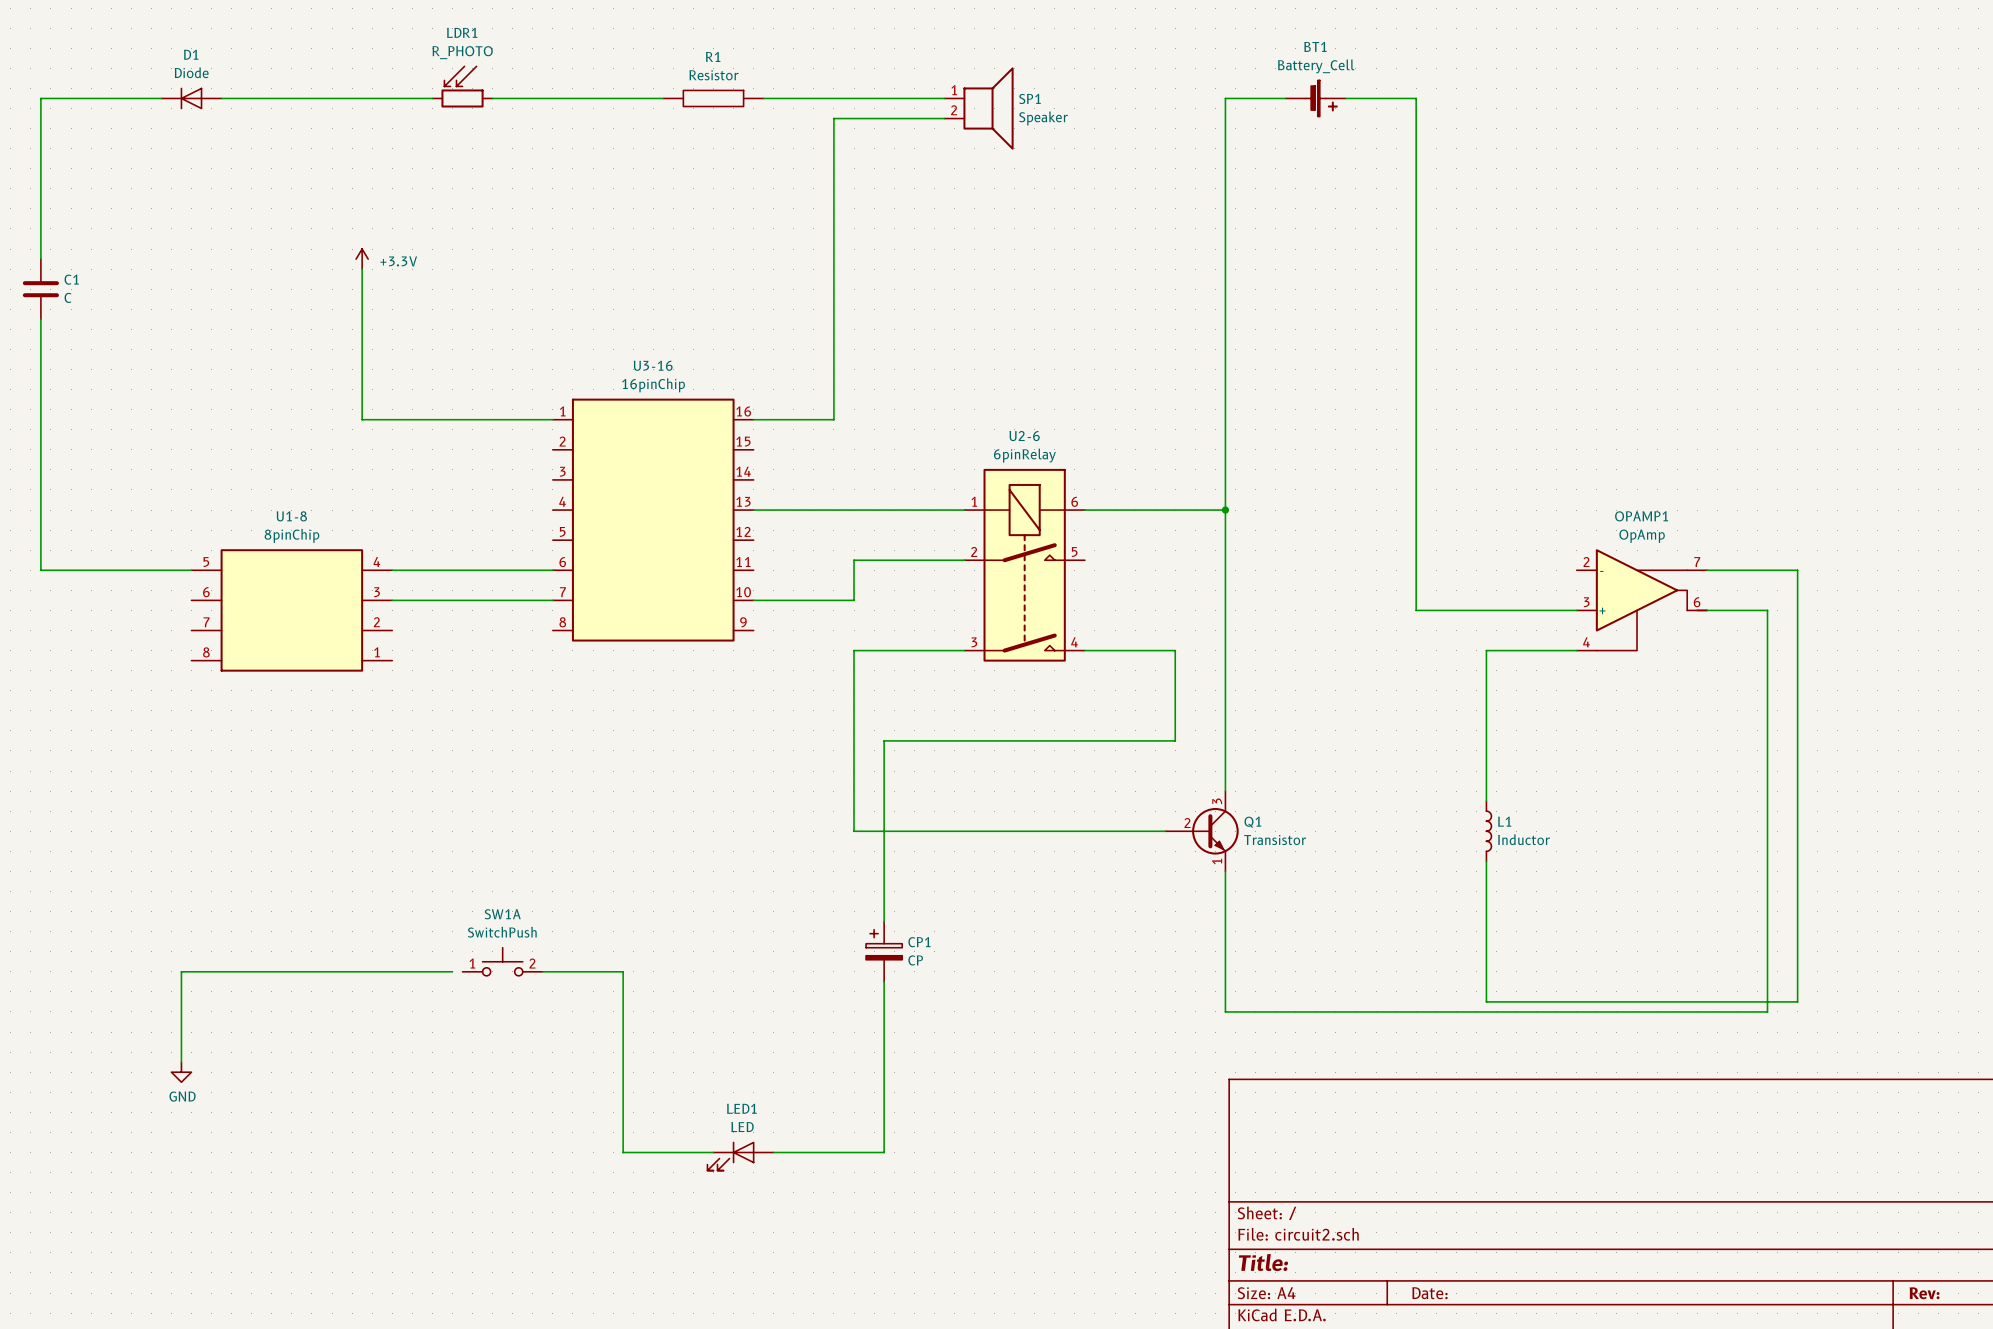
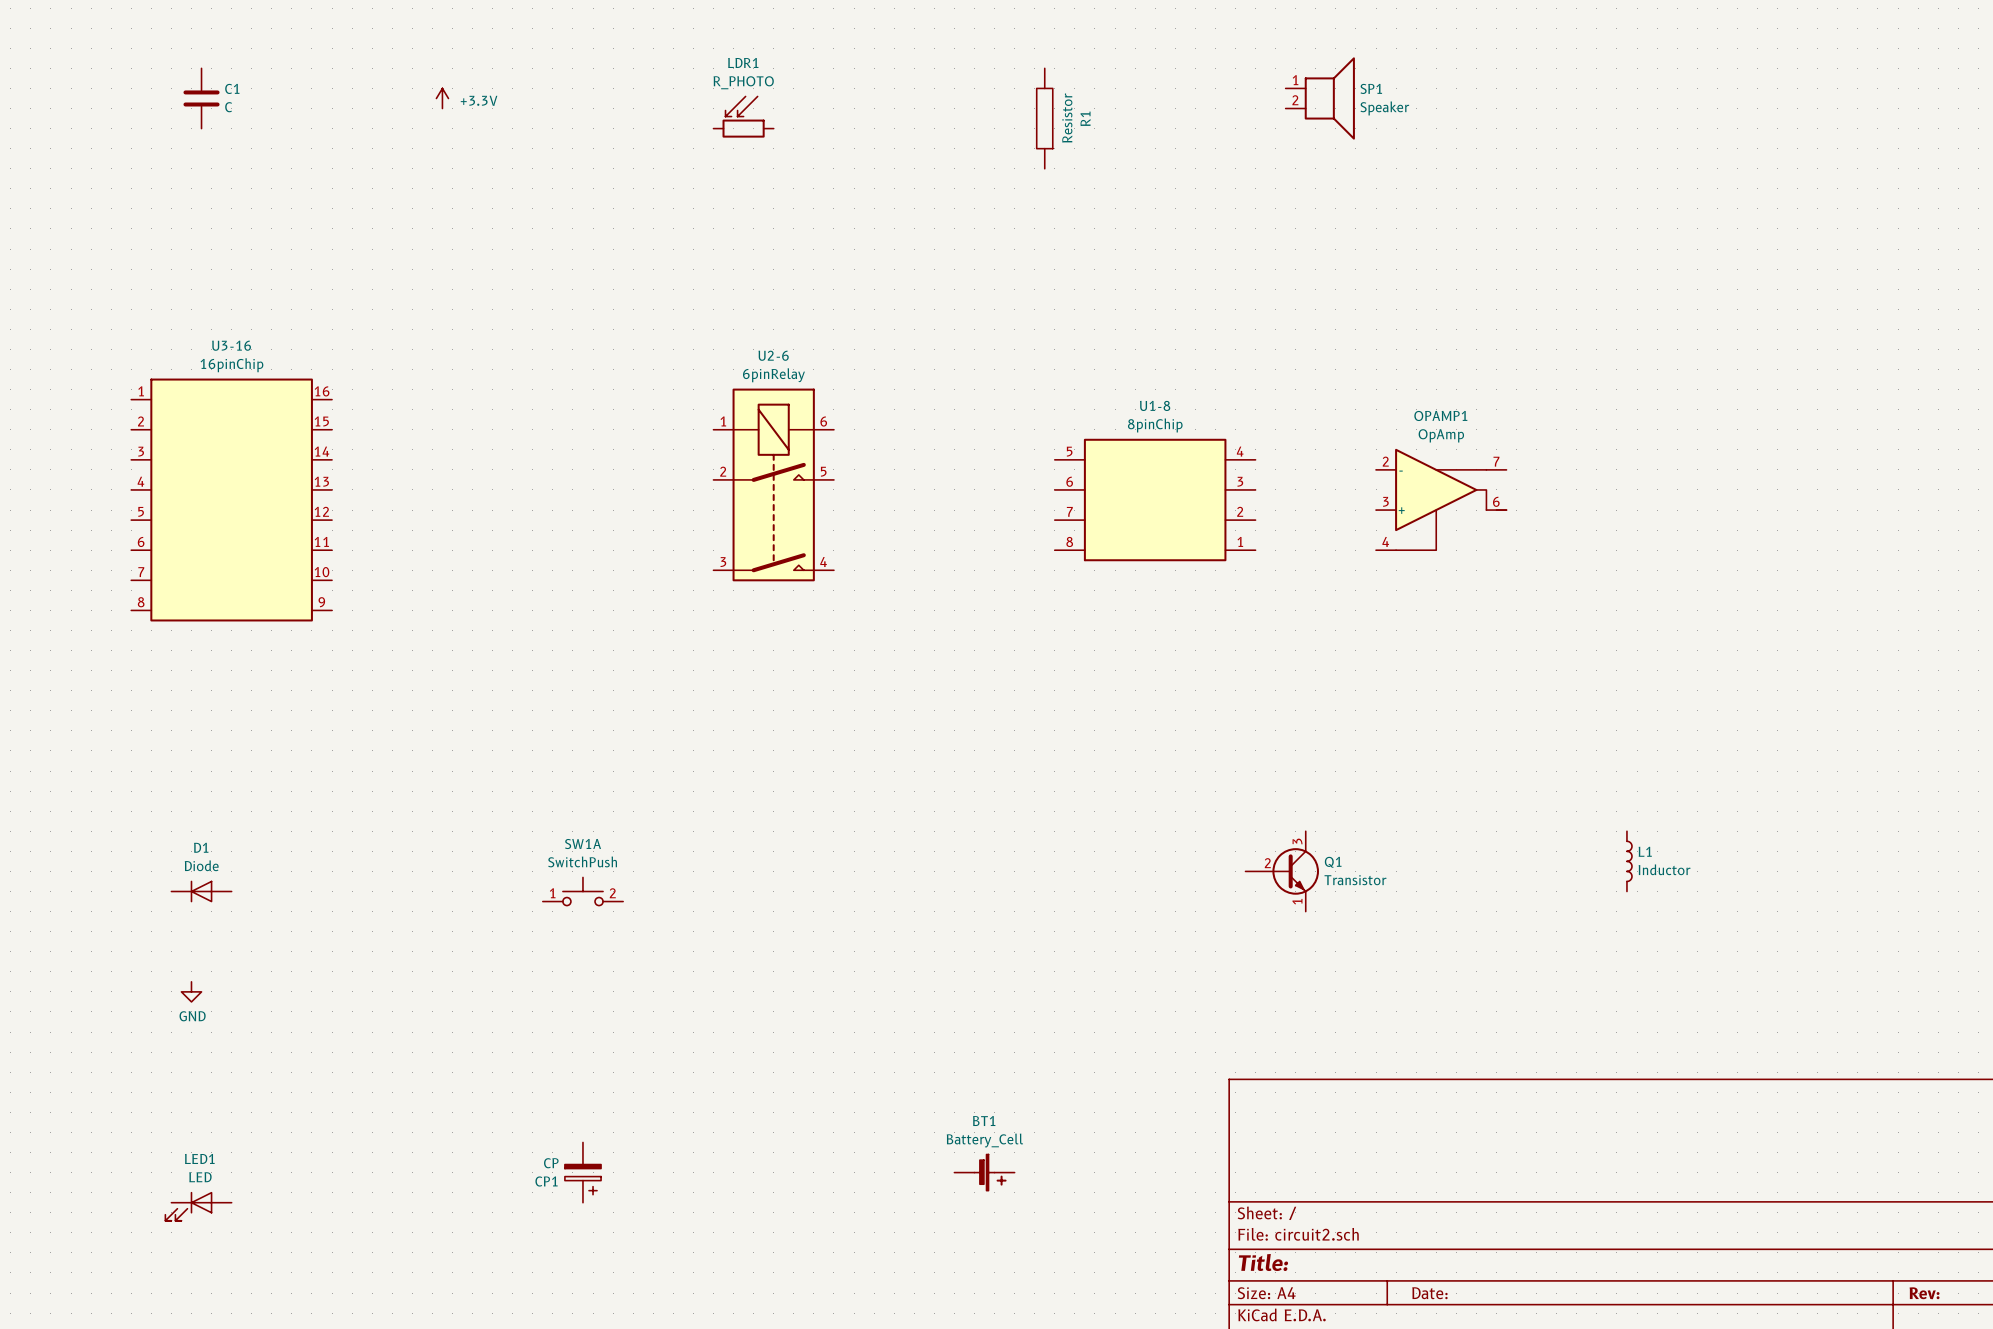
LDR1 position: (462, 86) -> (743, 117)
wire: (161, 98) (40, 98) (40, 259) -> none
D1 position: (191, 98) -> (201, 891)
wire: (221, 98) (432, 98) -> none
wire: (492, 98) (663, 98) -> none
R1 rotation: 0° (713, 98) -> 90° clockwise (1044, 118)
R1 position: (713, 98) -> (1044, 118)
wire: (763, 98) (944, 98) -> none
wire: (1285, 98) (1225, 98) (1225, 791) -> none
BT1 position: (1315, 98) -> (984, 1172)
wire: (1345, 98) (1416, 98) (1416, 610) (1576, 610) -> none
SP1 position: (978, 108) -> (1320, 98)
wire: (944, 118) (833, 118) (833, 419) (753, 419) -> none
power symbol position: +3.3V (362, 259) -> +3.3V (442, 98)
wire: (362, 269) (362, 419) (552, 419) -> none
C1 position: (40, 289) -> (201, 98)
wire: (40, 319) (40, 570) (191, 570) -> none
wire: (753, 510) (964, 510) -> none
junction: (1225, 510) -> none
U3-16 position: (653, 520) -> (231, 500)
wire: (964, 560) (854, 560) (854, 600) (753, 600) -> none
U2-6 position: (1024, 565) -> (773, 484)
wire: (392, 570) (552, 570) -> none
wire: (1707, 570) (1797, 570) (1797, 1001) (1486, 1001) (1486, 861) -> none
OPAMP1 position: (1642, 599) -> (1441, 499)
wire: (392, 600) (552, 600) -> none
U1-8 position: (291, 610) -> (1155, 500)
wire: (1707, 610) (1767, 610) (1767, 1011) (1225, 1011) (1225, 871) -> none
wire: (964, 650) (854, 650) (854, 831) (1165, 831) -> none
wire: (1084, 650) (1175, 650) (1175, 740) (884, 740) (884, 921) -> none
wire: (1576, 650) (1486, 650) (1486, 801) -> none
Q1 position: (1201, 831) -> (1282, 871)
L1 position: (1488, 831) -> (1629, 861)
CP1 rotation: 0° (884, 944) -> 180° (582, 1179)
CP1 position: (884, 951) -> (582, 1172)
SW1A position: (502, 961) -> (582, 891)
wire: (452, 971) (181, 971) (181, 1062) -> none
wire: (542, 971) (623, 971) (623, 1152) (713, 1152) -> none
wire: (884, 981) (884, 1152) (773, 1152) -> none
power symbol position: GND (181, 1072) -> GND (191, 991)
LED1 position: (740, 1156) -> (198, 1206)

